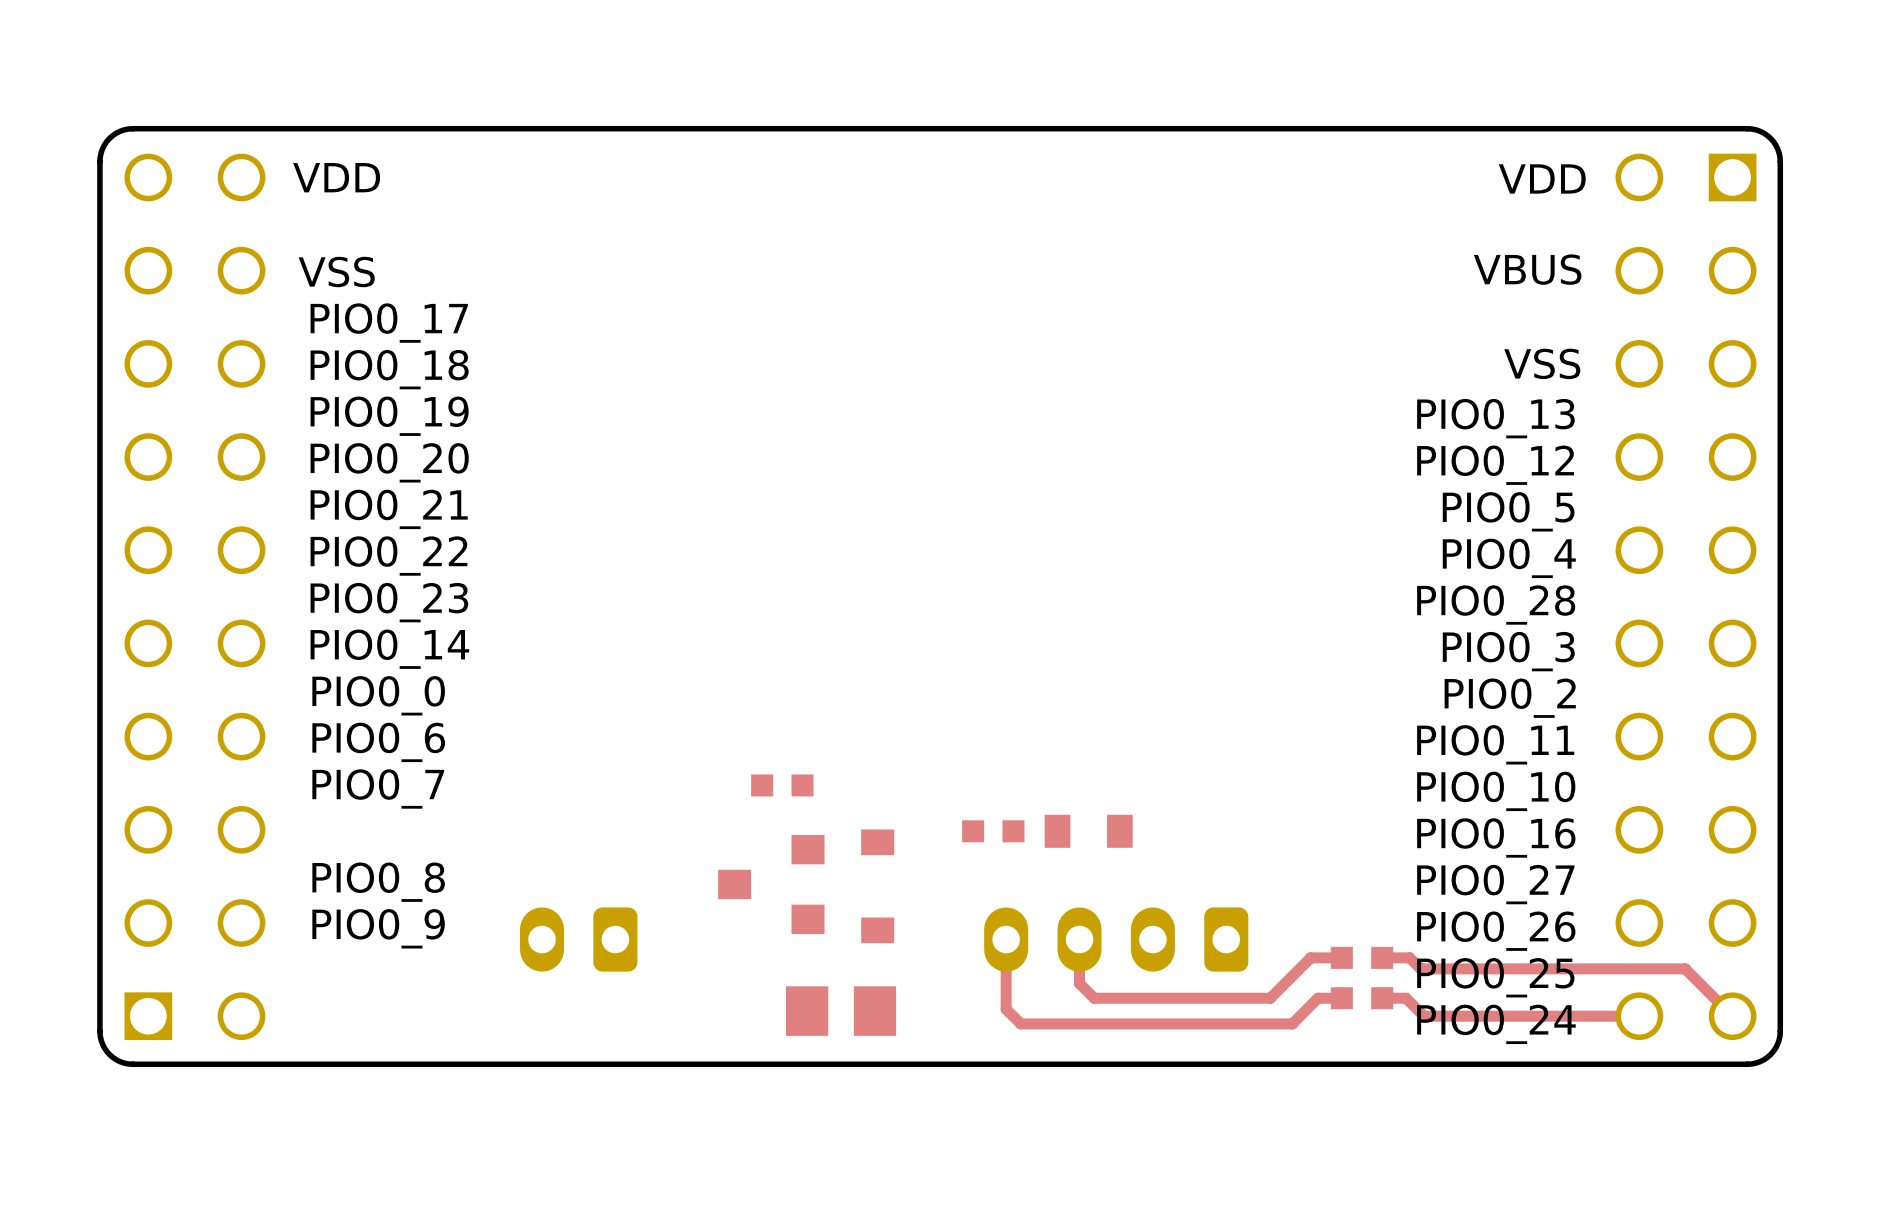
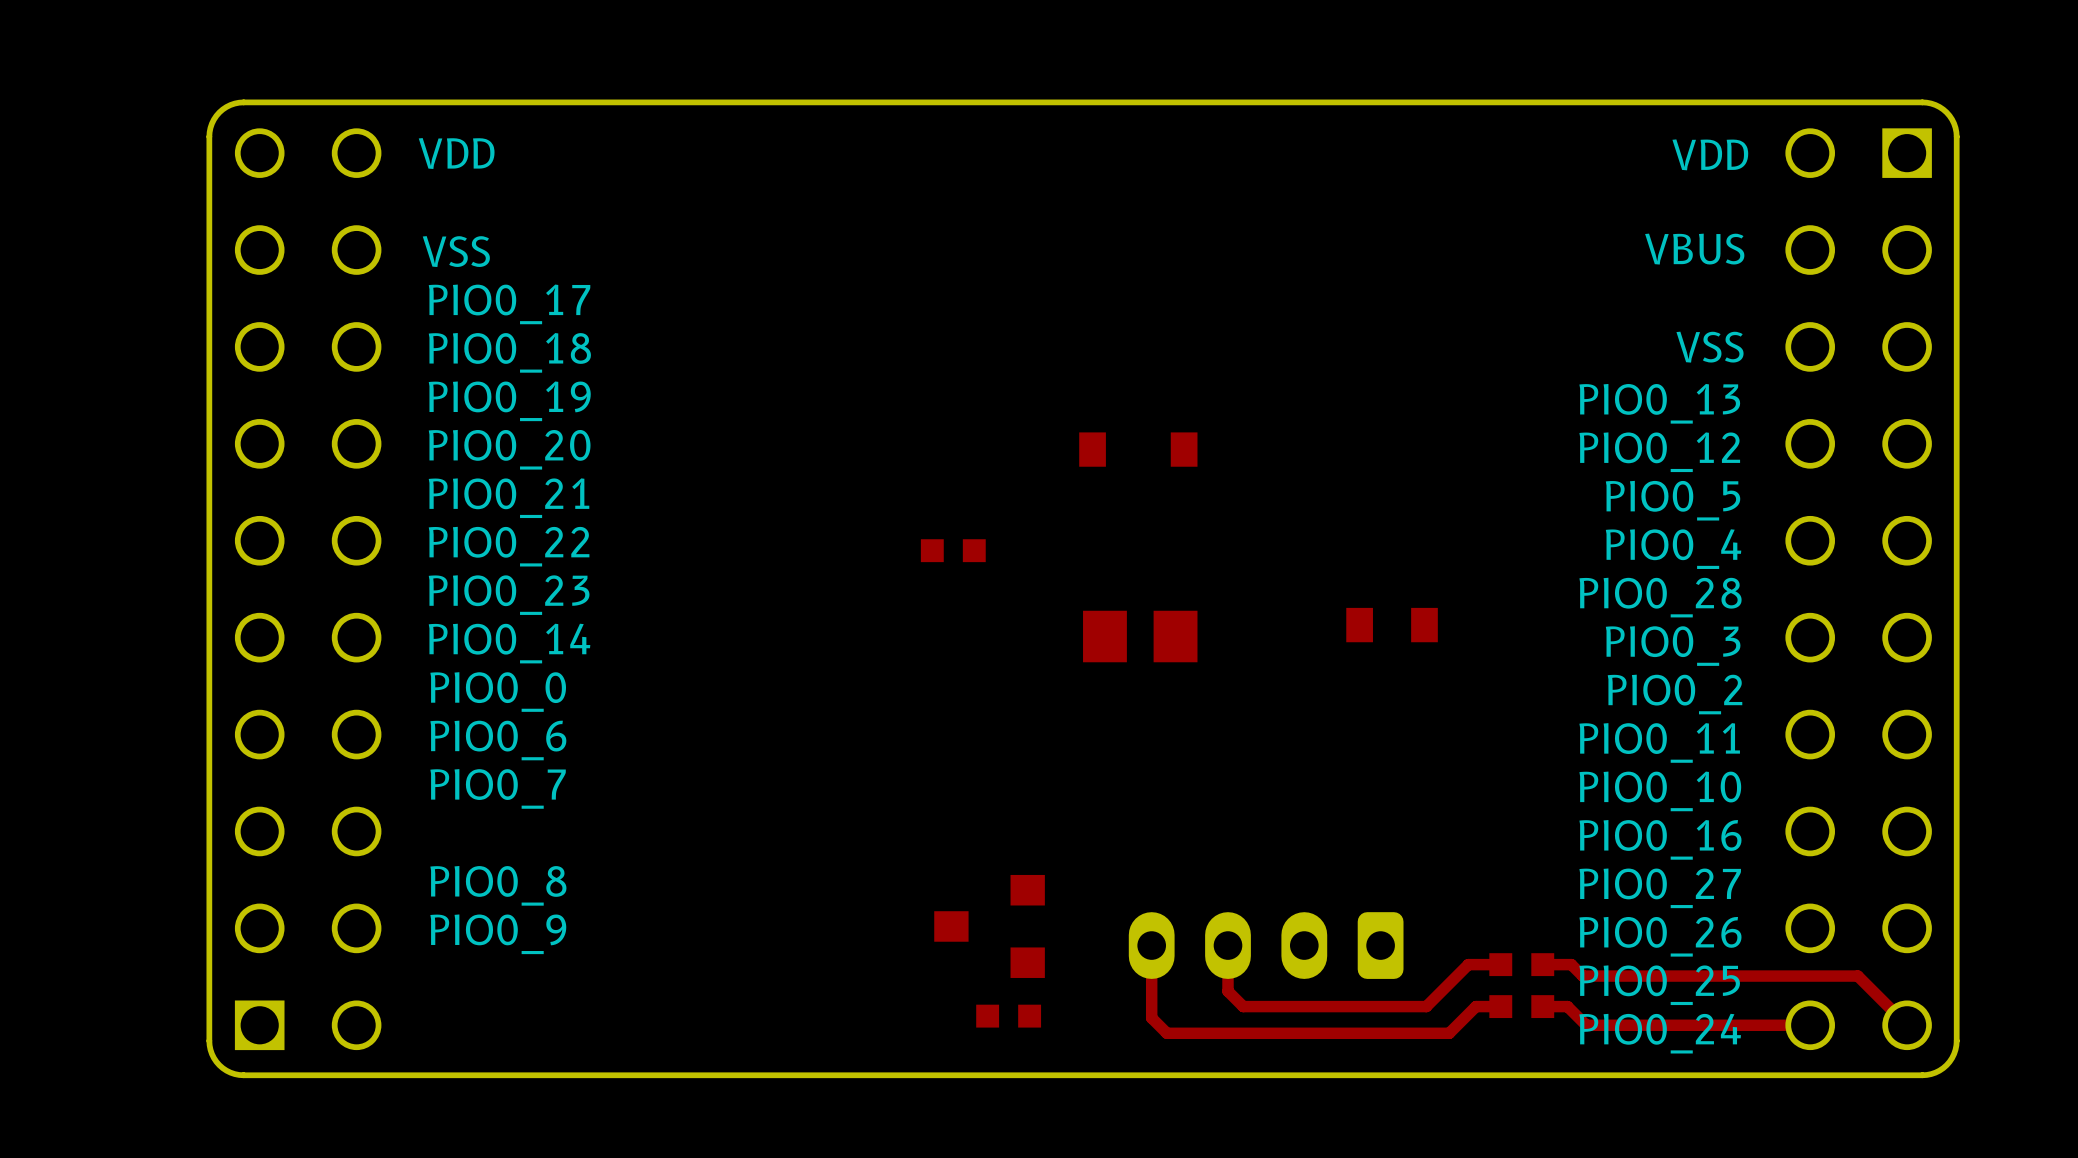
part: none -> (953, 550)
part: none -> (1140, 636)
part: (782, 785) -> none
part: (993, 831) -> none
part position: (1088, 831) -> (1392, 625)
part position: (771, 884) -> (989, 926)
part rotation: 0° (877, 886) -> 90° clockwise (1138, 449)
part position: (877, 886) -> (1138, 449)
part: (578, 939) -> none
part footprint: [786, 986, 897, 1036] -> [976, 1004, 1042, 1028]

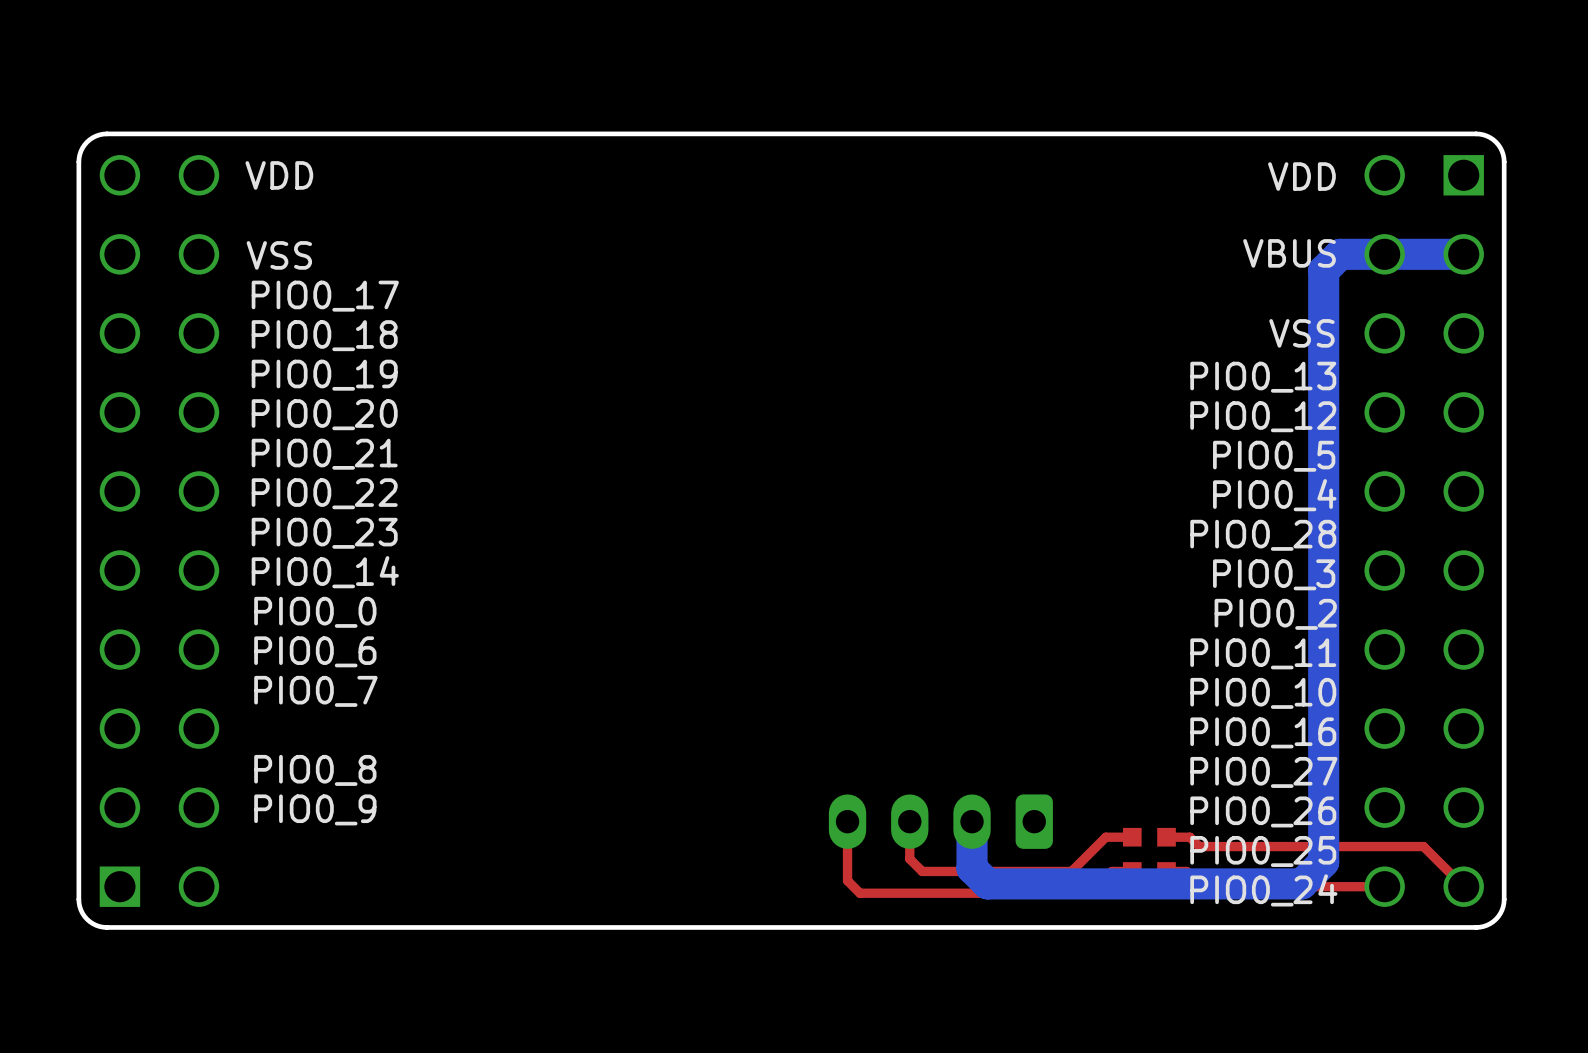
bottom track: none -> (1463, 254) (1340, 254) (1323, 270) (1323, 862) (1301, 883) (987, 883) (972, 868) (972, 821)
part: (1138, 449) -> none
part: (953, 550) -> none
part: (1392, 625) -> none
part: (1140, 636) -> none
part: (989, 926) -> none
part: (1008, 1016) -> none

